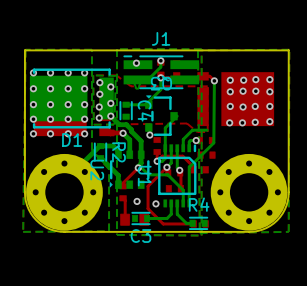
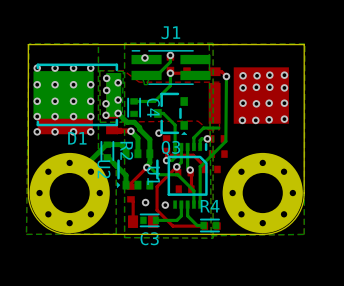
Q3 rotation: 0° (161, 115) -> 180° (171, 113)
bottom track: (177, 116) (165, 128) -> (157, 113) (163, 113) (175, 125)

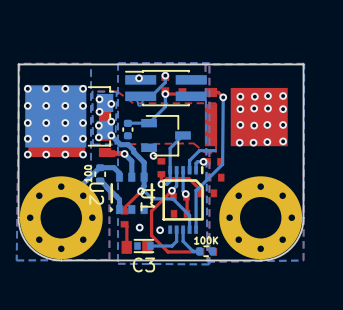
J1: (171, 67) -> none
part: none -> (165, 88)
D1: (77, 94) -> none
part: none -> (69, 116)
C4: (134, 107) -> none
part: none -> (127, 129)
bottom track: (157, 113) (163, 113) (175, 125) -> (182, 135) (170, 148)
Q3: (171, 113) -> none
part: none -> (166, 135)
R2: (107, 150) -> none
part: none -> (100, 174)
R4: (209, 225) -> none
part: none -> (206, 251)

